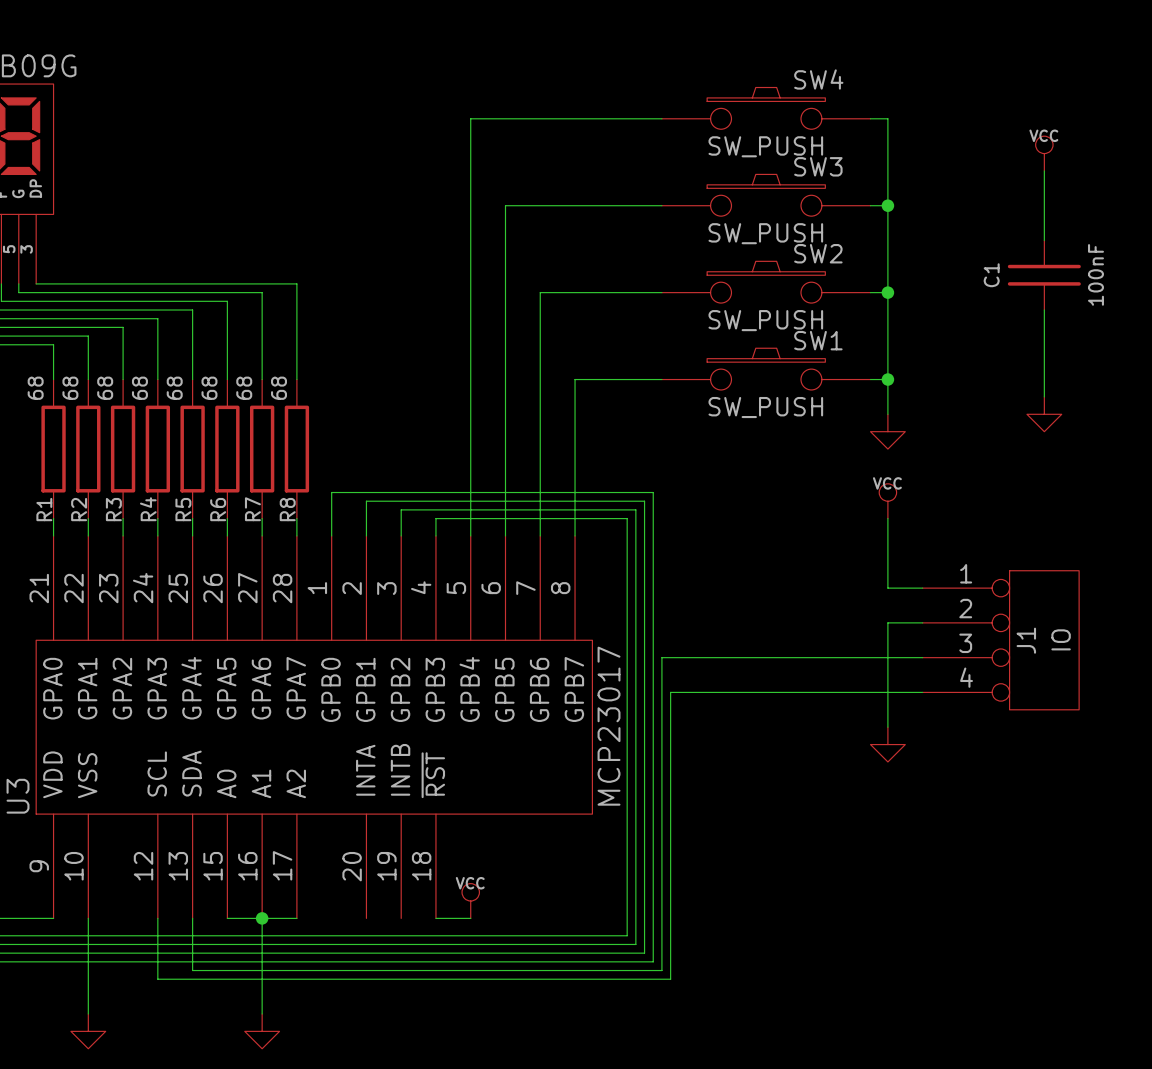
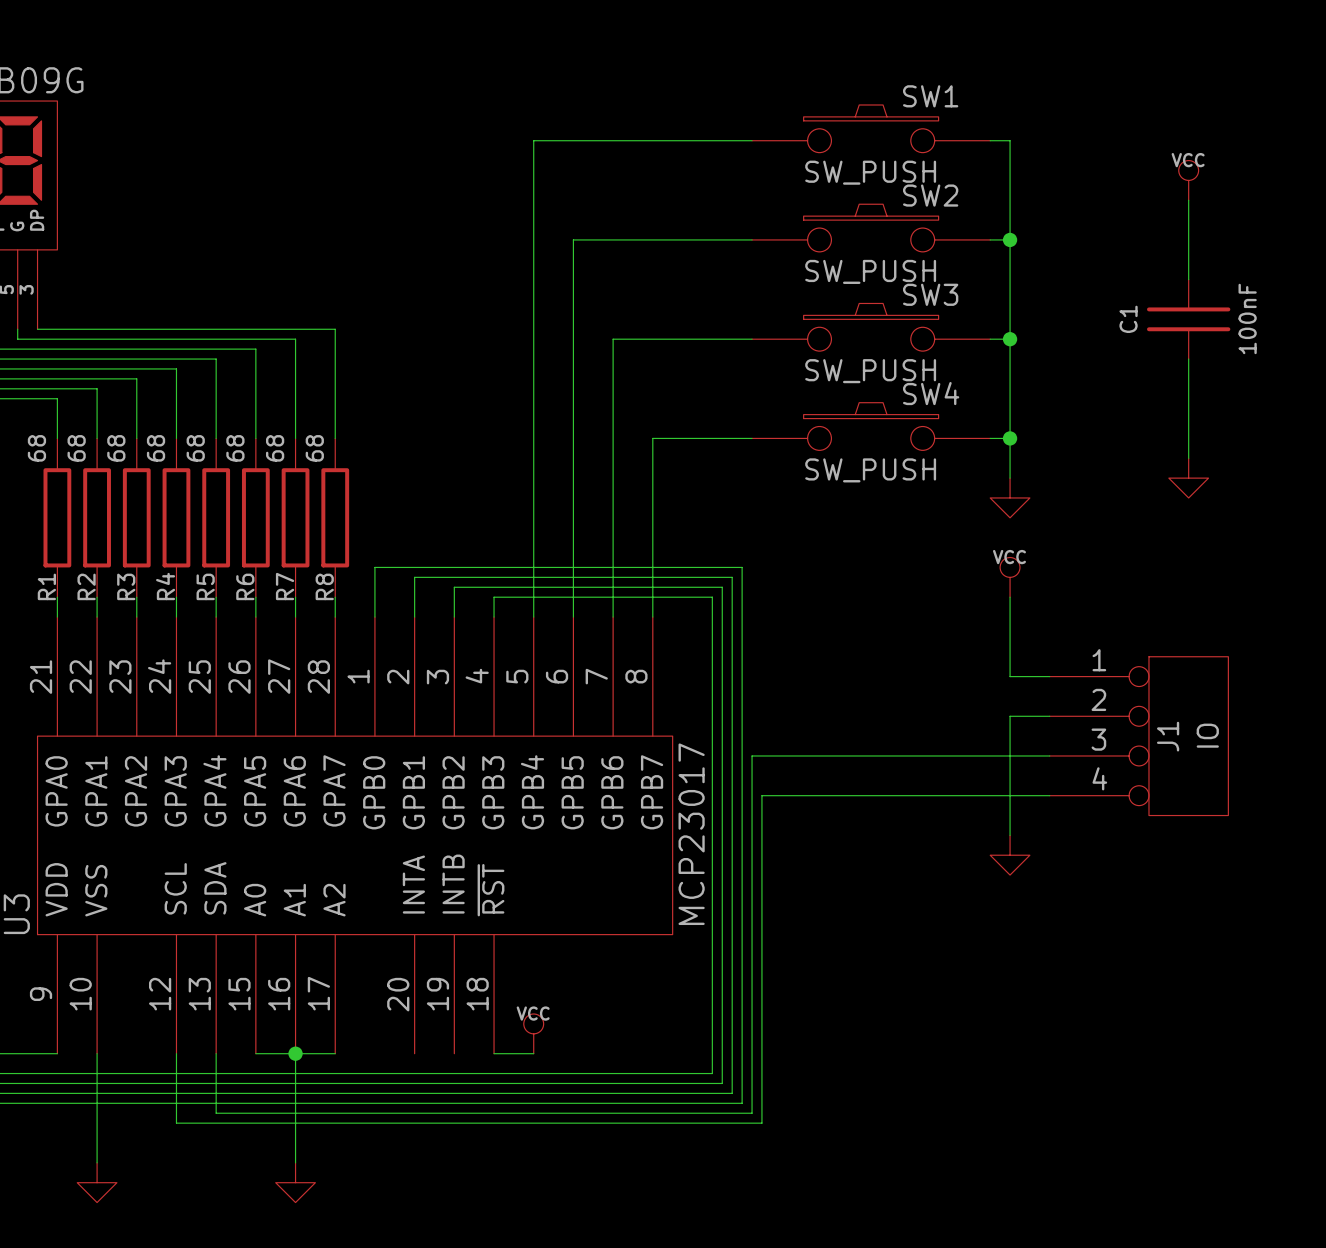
SW4 name: SW4 (818, 79) -> SW1 (930, 96)
SW3 name: SW3 (818, 166) -> SW2 (930, 195)
SW2 name: SW2 (818, 253) -> SW3 (930, 294)
SW1 name: SW1 (818, 340) -> SW4 (931, 393)

